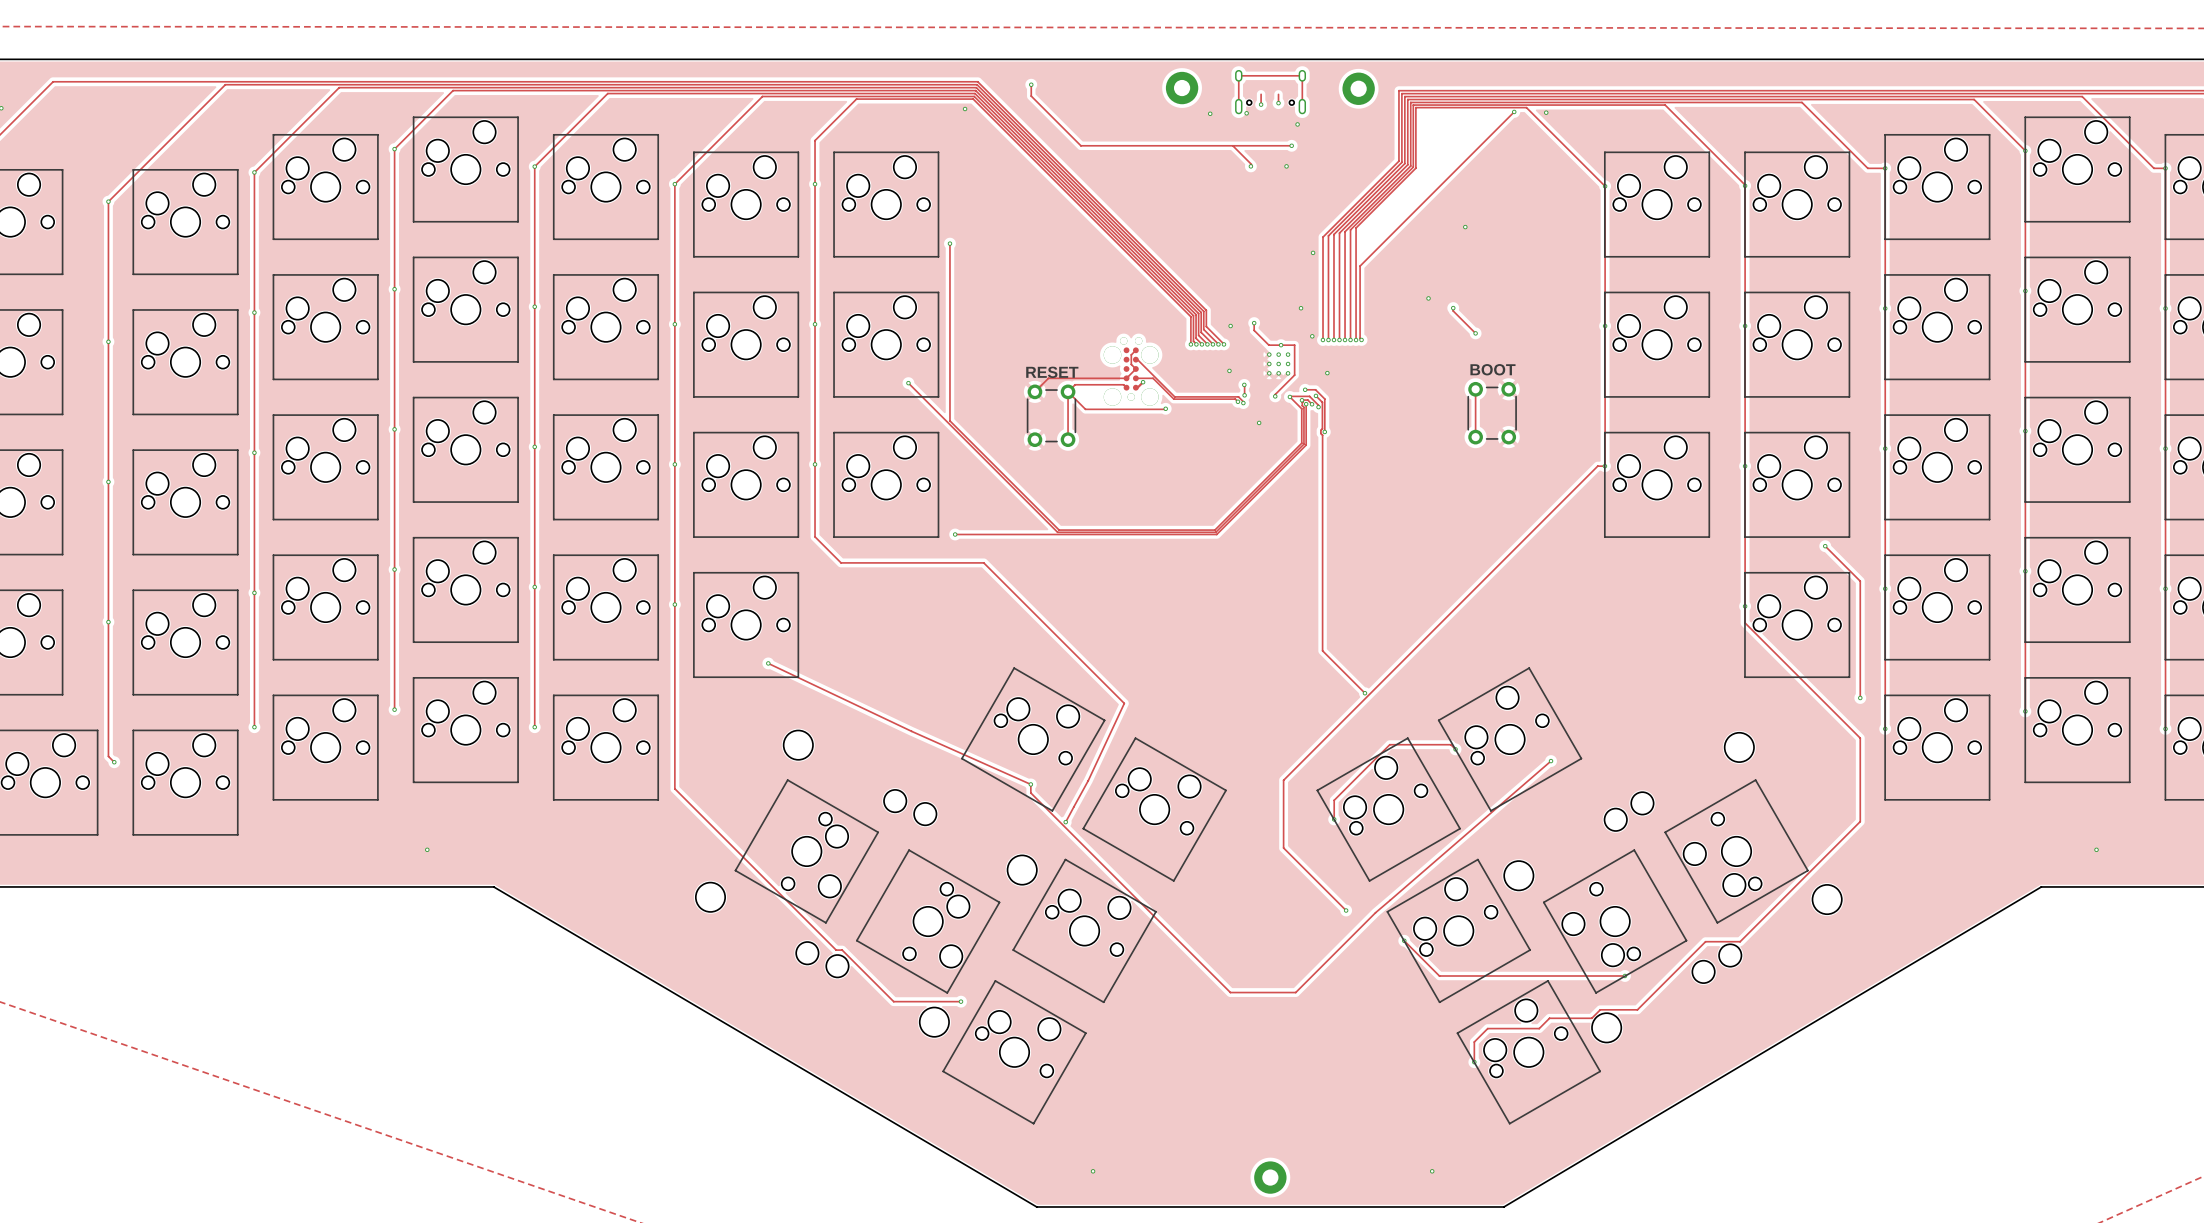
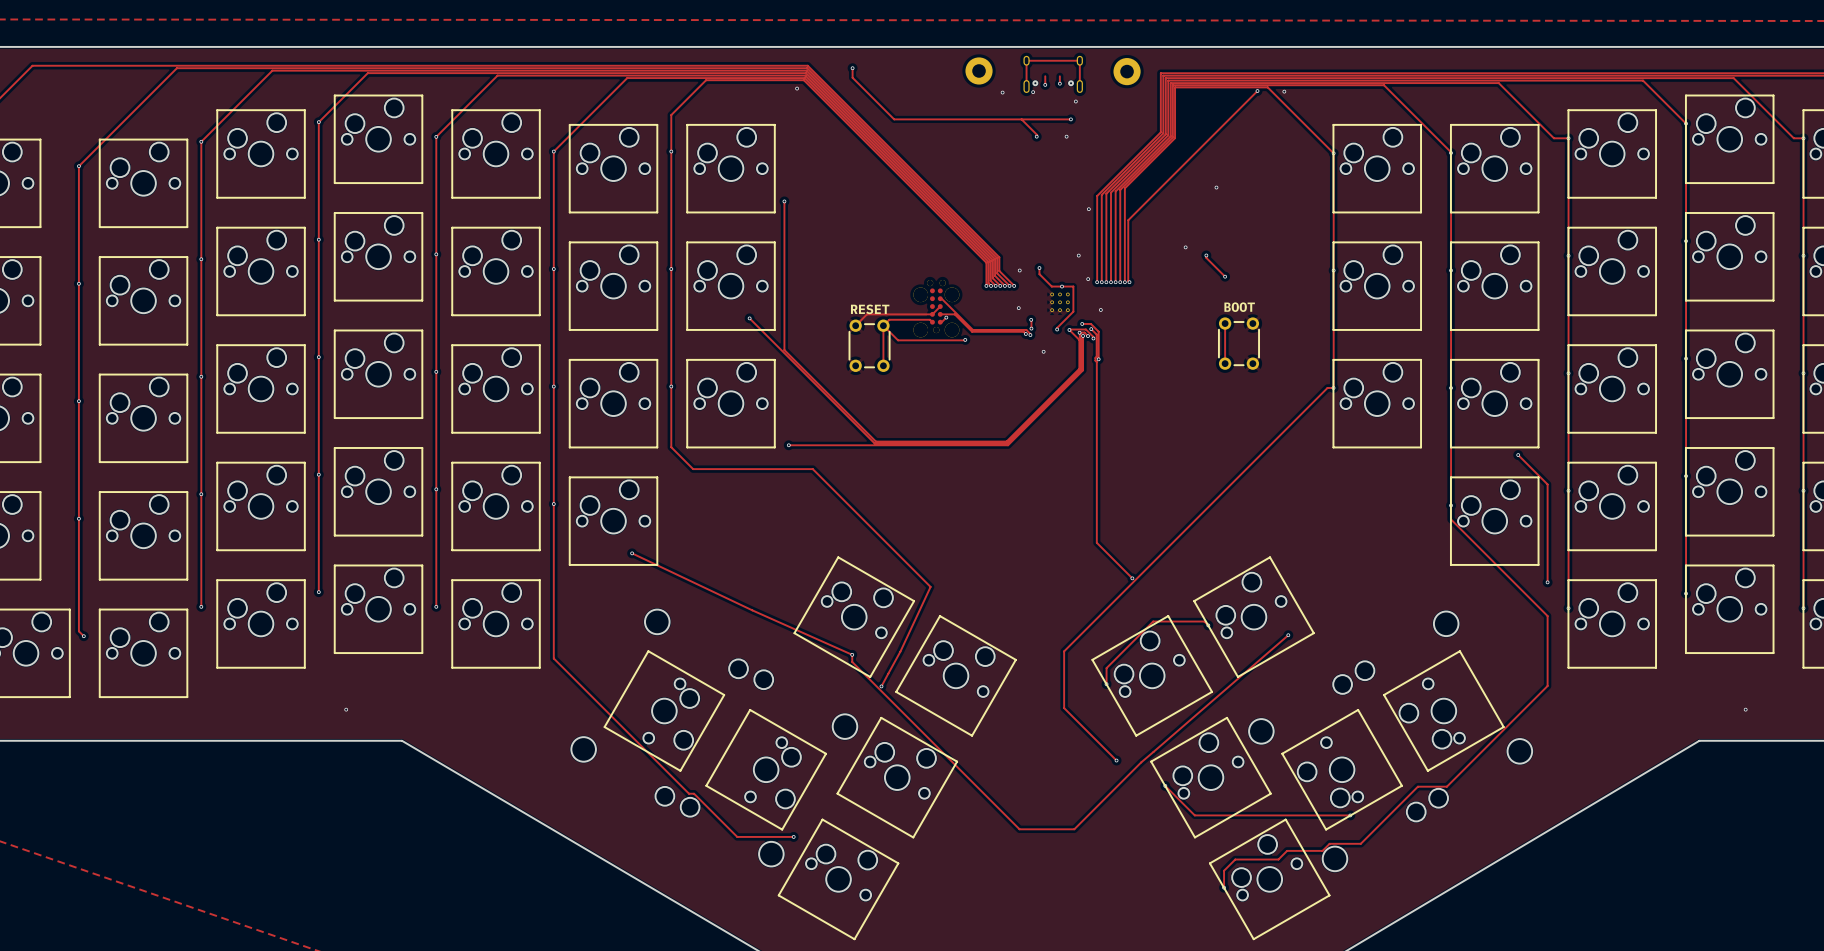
track: (1135, 350) (1131, 354) (1131, 364) (1135, 368) -> none

